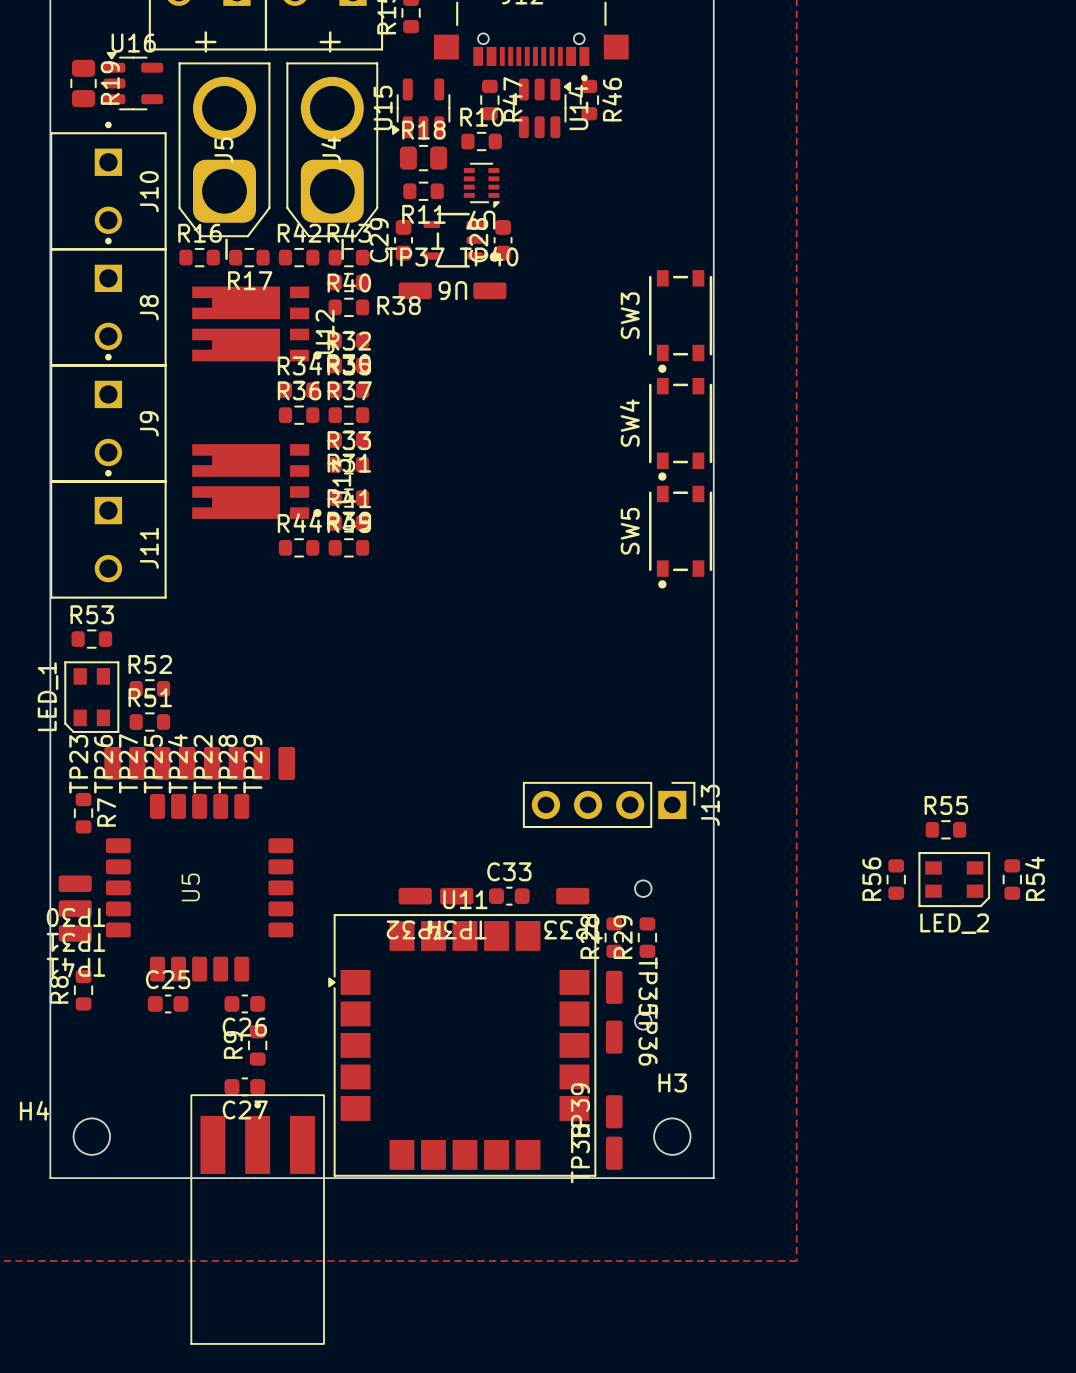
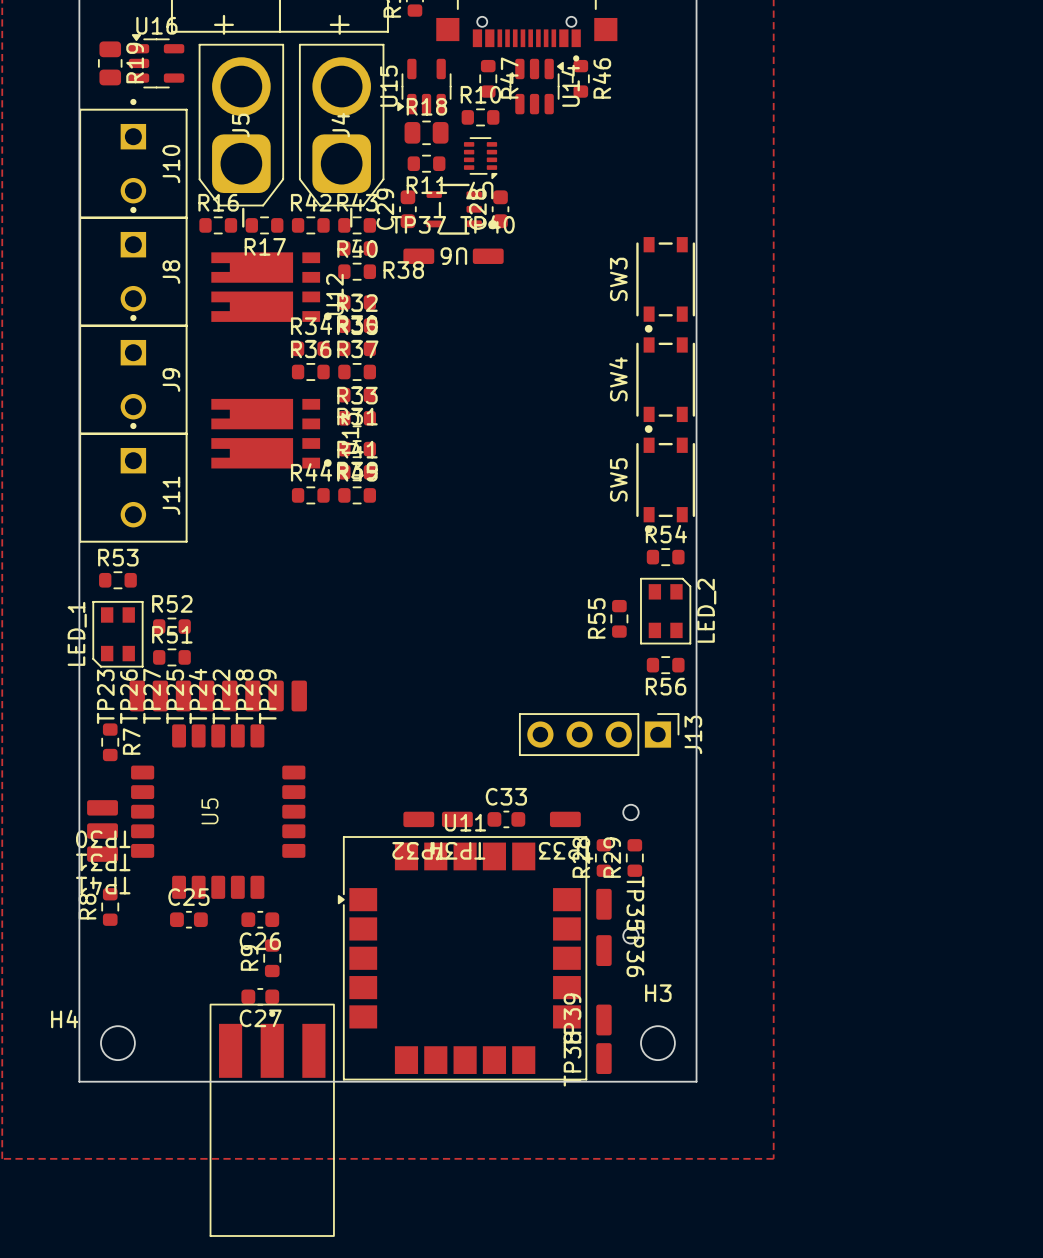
R55 name position: R55 (946, 805) -> R55 (596, 618)
R55 rotation: 0° (945, 829) -> 90° clockwise (619, 618)
R55 position: (945, 829) -> (619, 618)
R54 name position: R54 (1035, 878) -> R54 (666, 534)
R56 name position: R56 (871, 879) -> R56 (666, 686)
R56 rotation: 0° (896, 879) -> 90° clockwise (665, 665)
R56 position: (896, 879) -> (665, 665)
LED_2 rotation: 0° (954, 879) -> 90° counterclockwise (665, 611)
LED_2 position: (954, 879) -> (665, 611)
R54 rotation: 0° (1012, 879) -> 90° clockwise (665, 557)
R54 position: (1012, 879) -> (665, 557)

